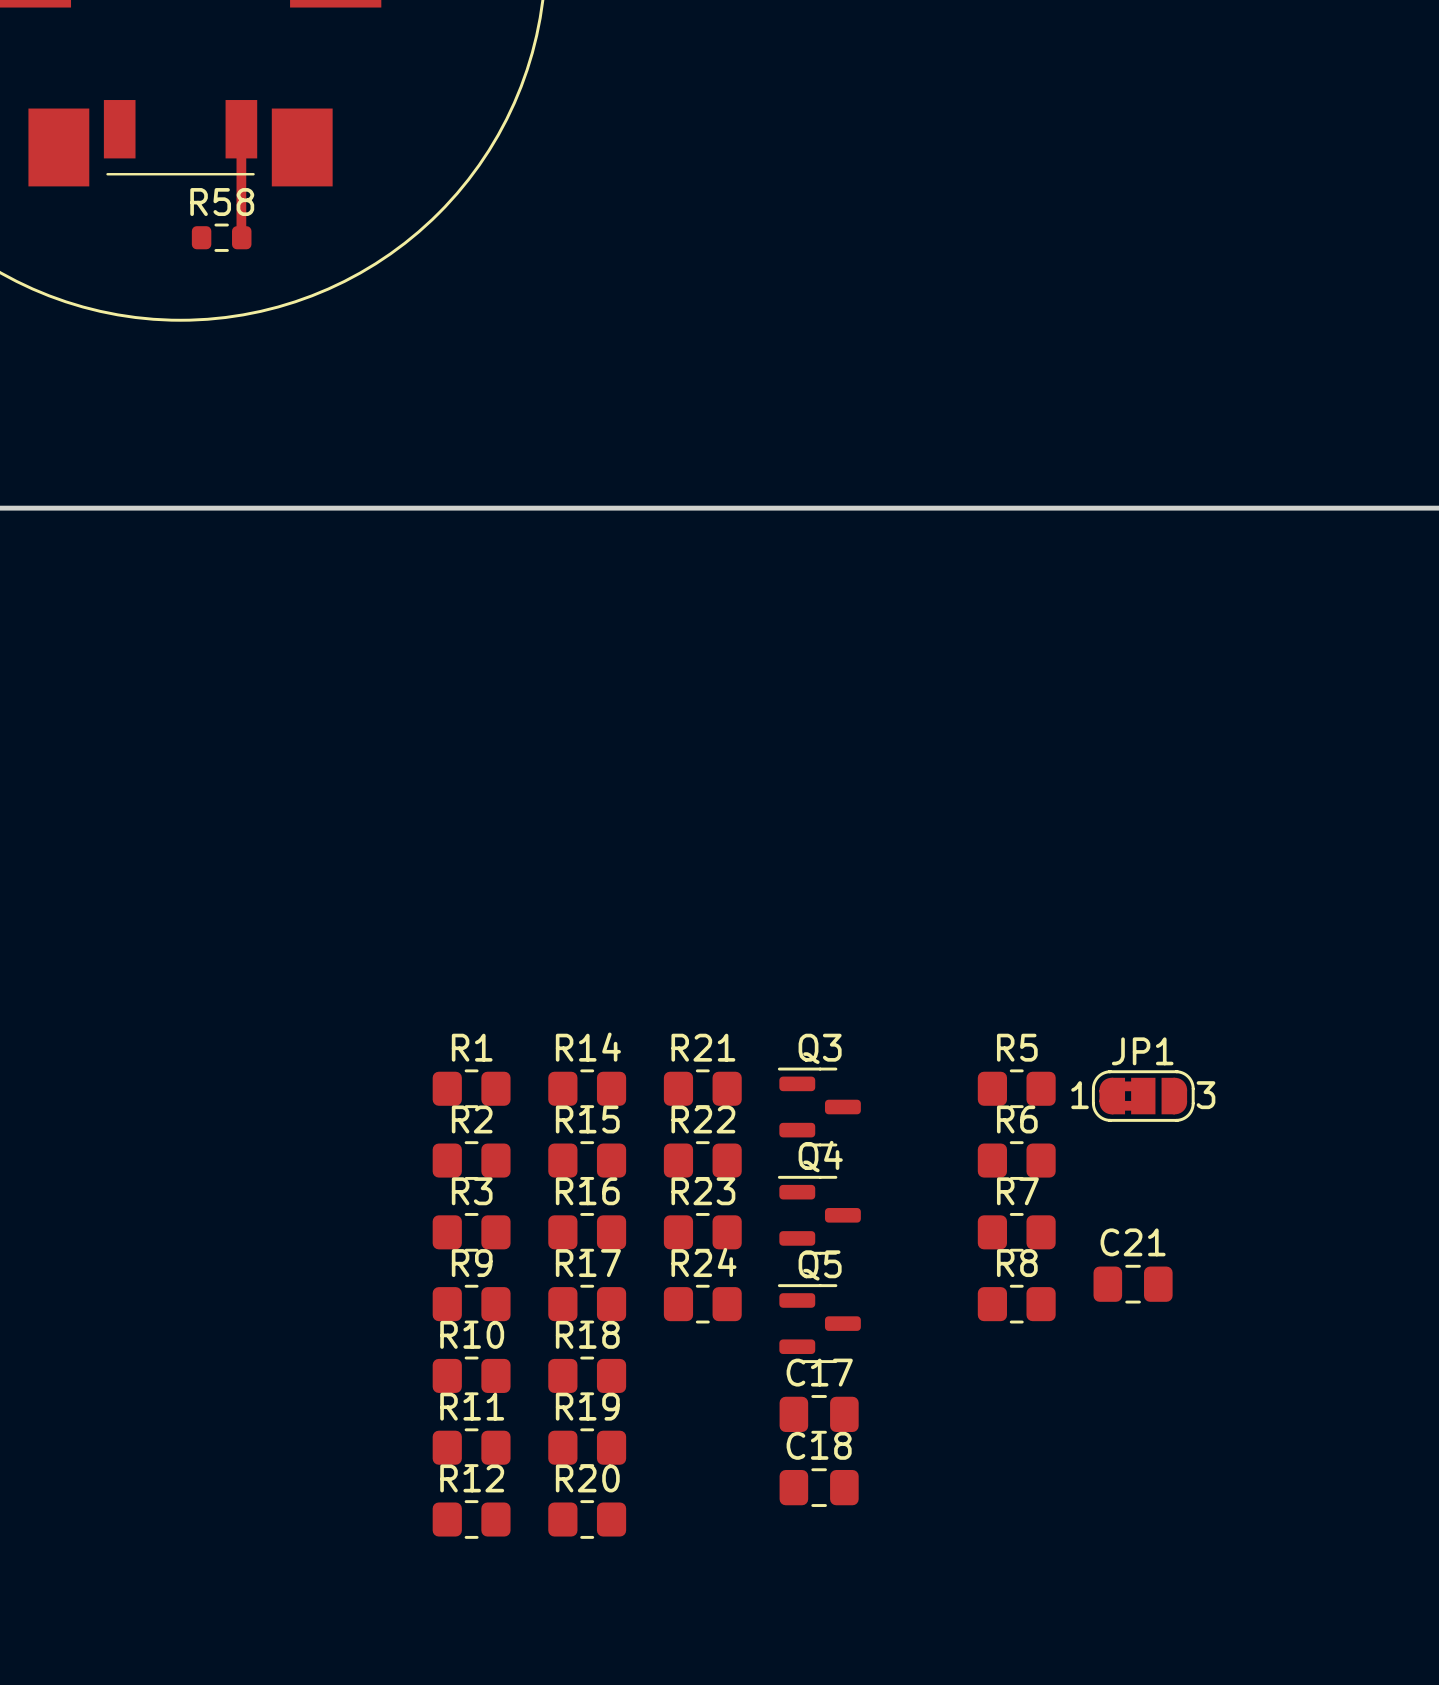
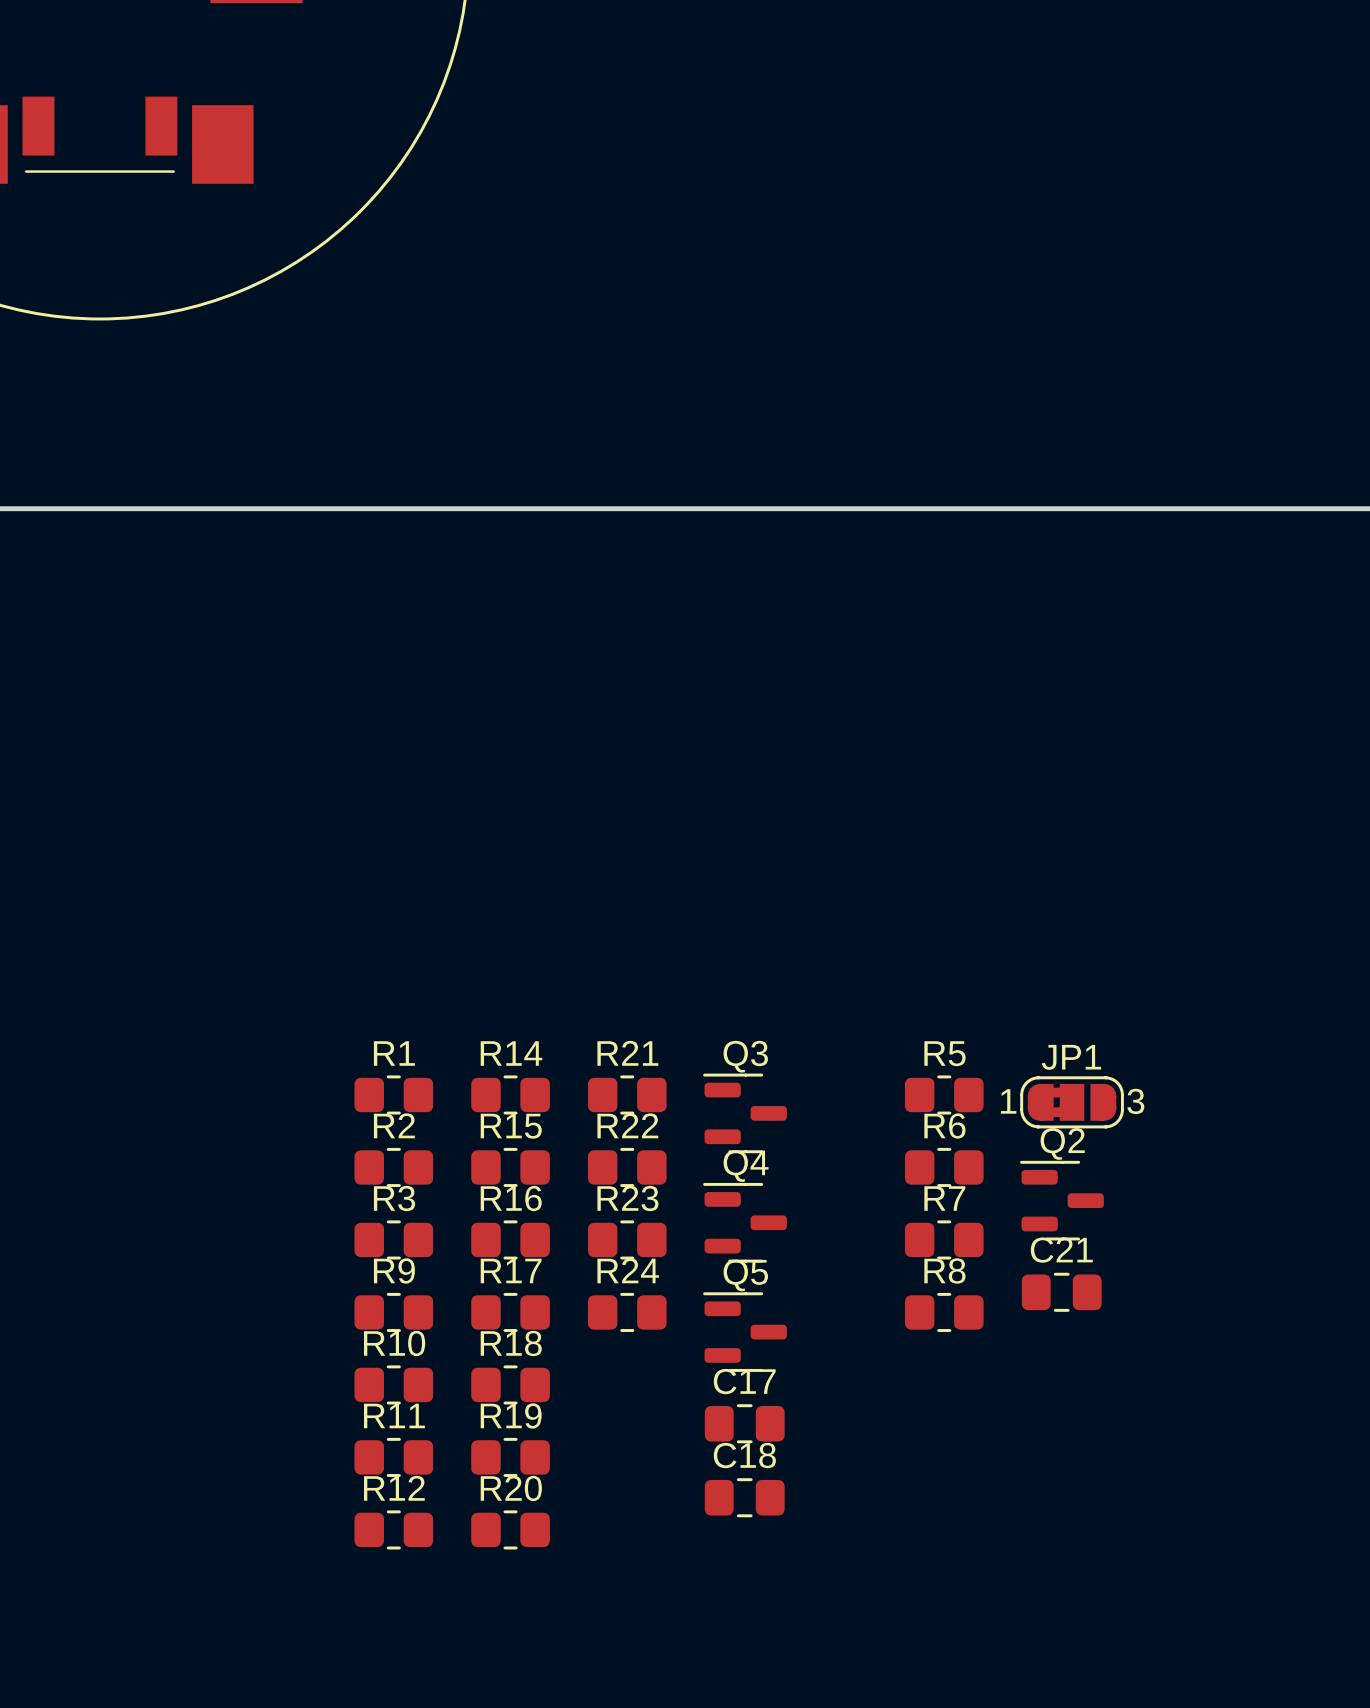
top track: (241, 129) (241, 237) -> none
R58: (221, 237) -> none
Q2: none -> (1061, 1200)

